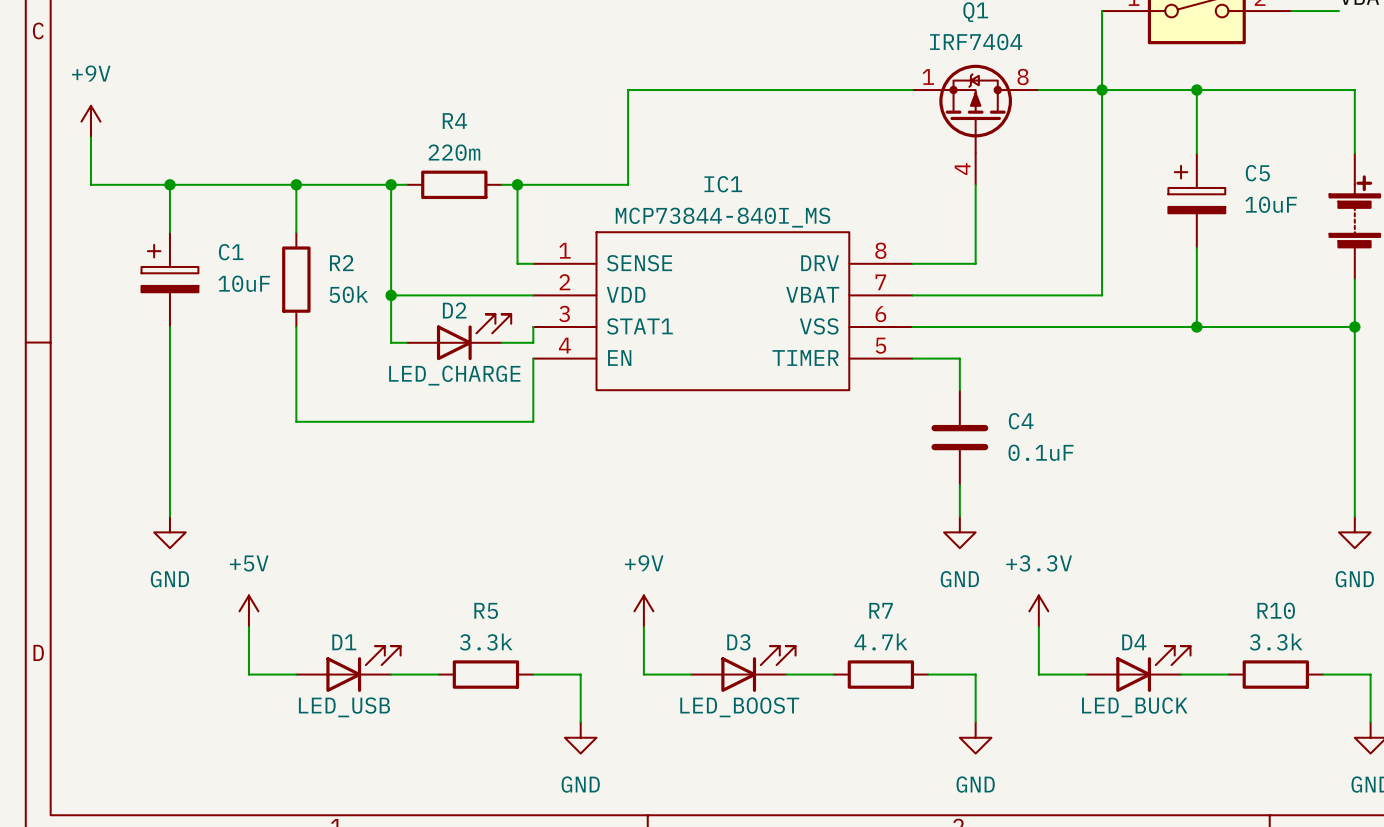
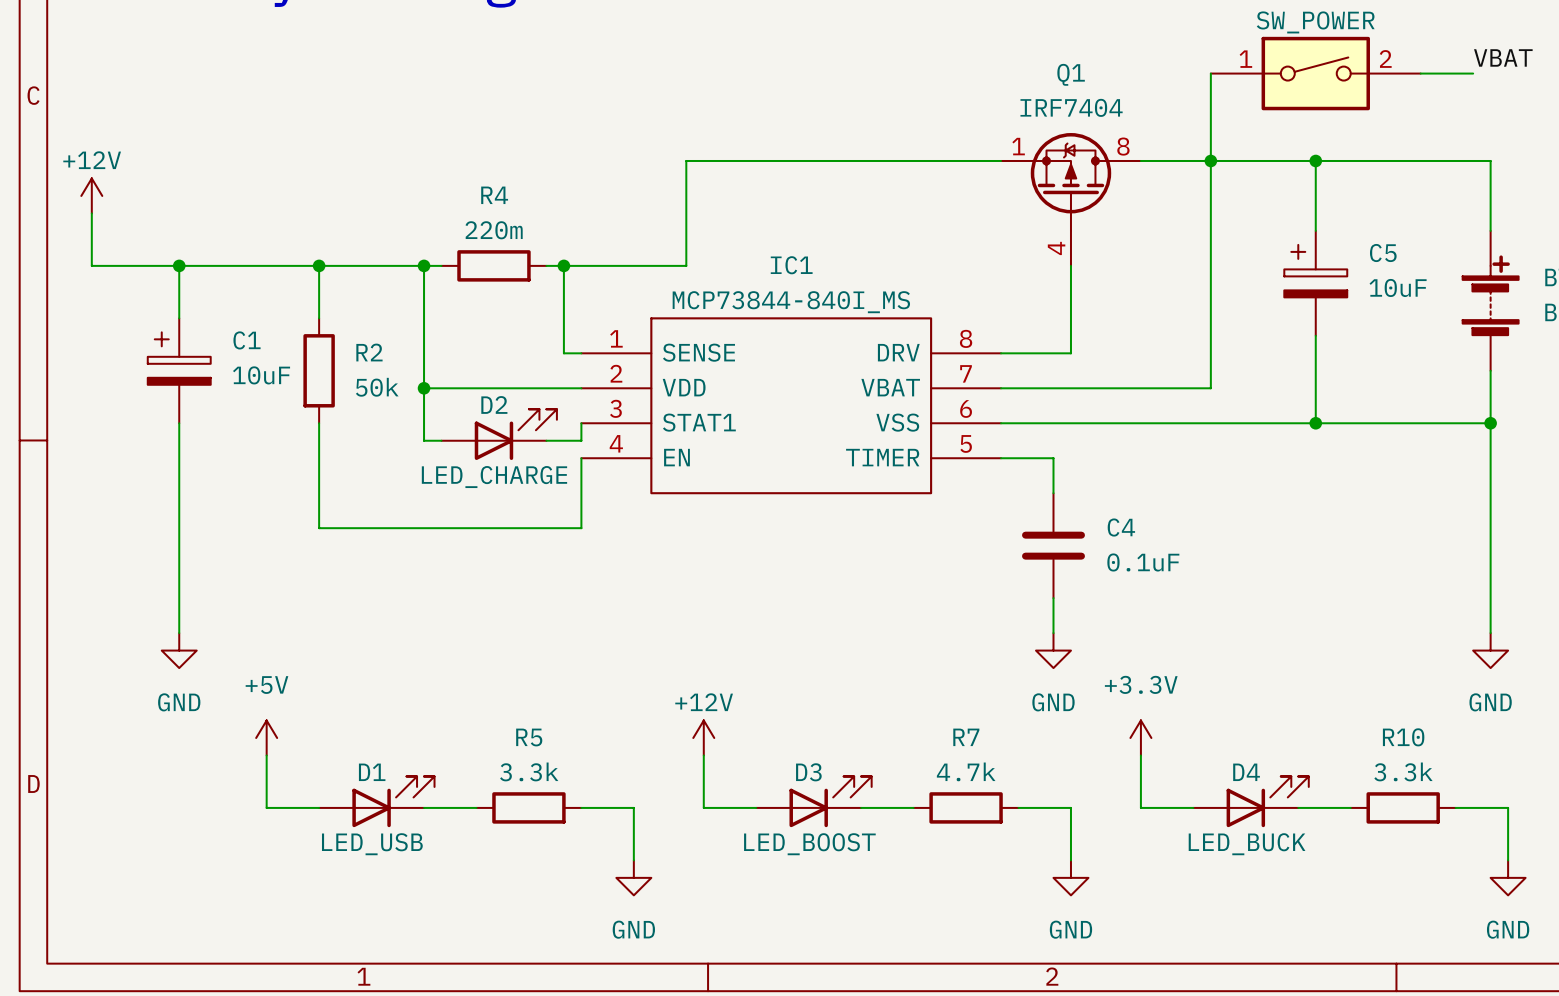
power symbol: +9V (90, 121) -> +12V (91, 195)
power symbol: +9V (643, 611) -> +12V (703, 737)

